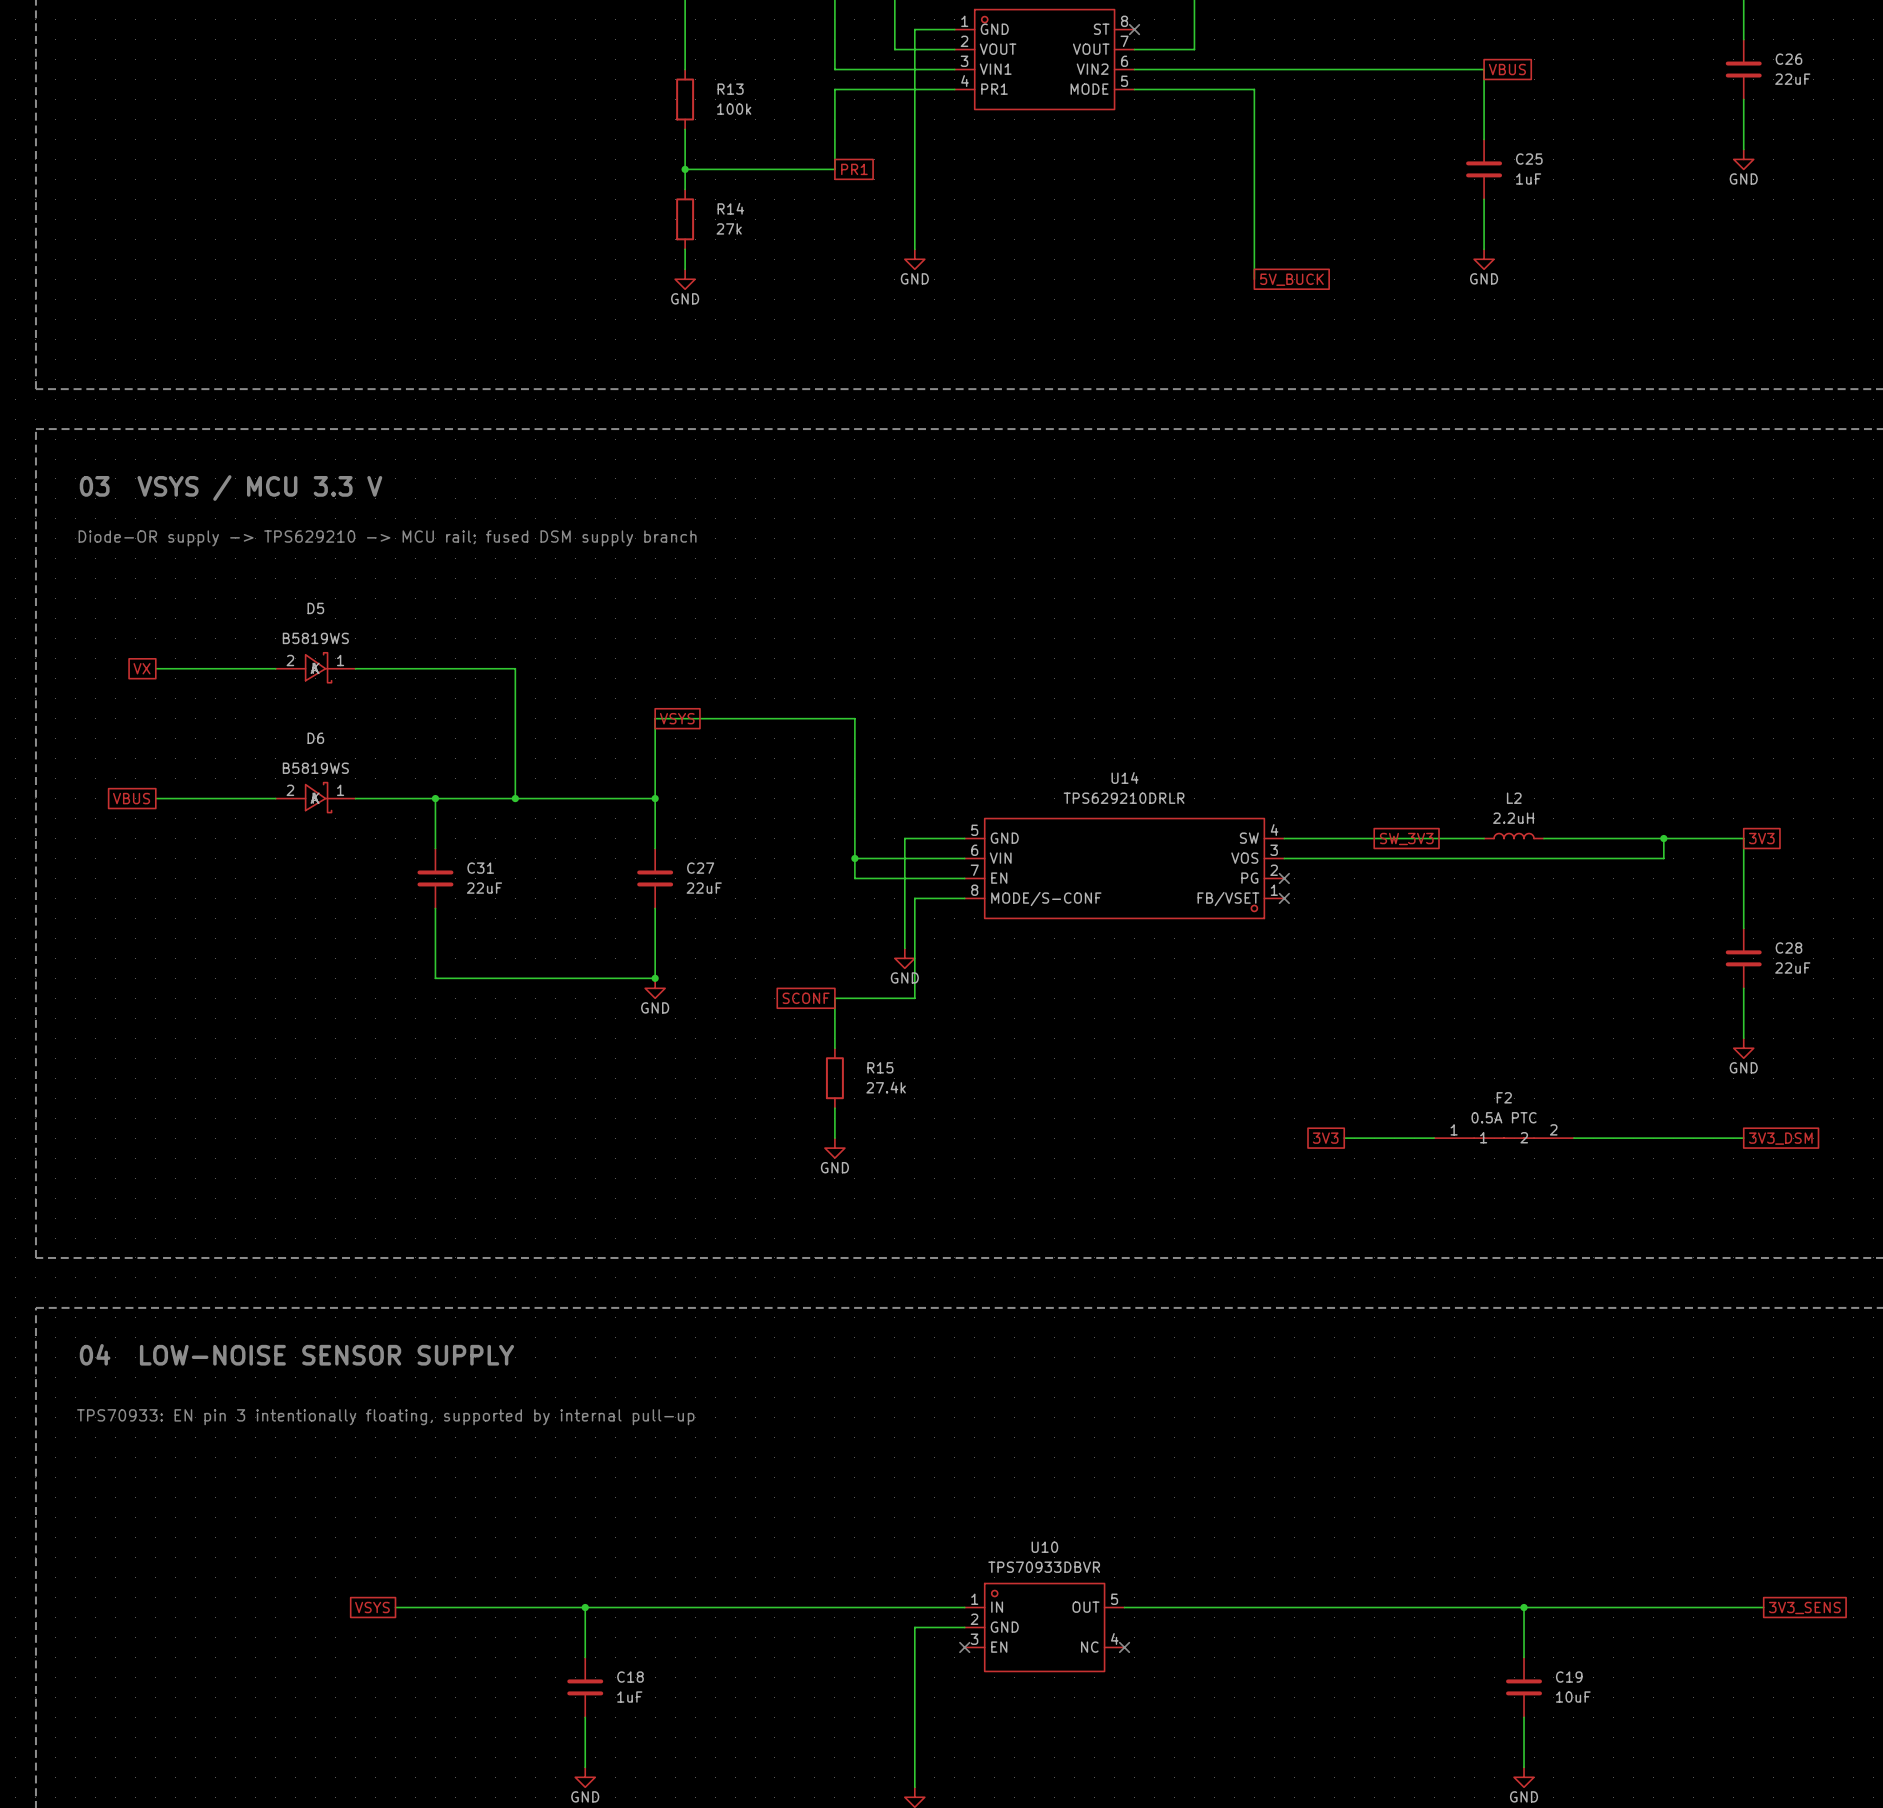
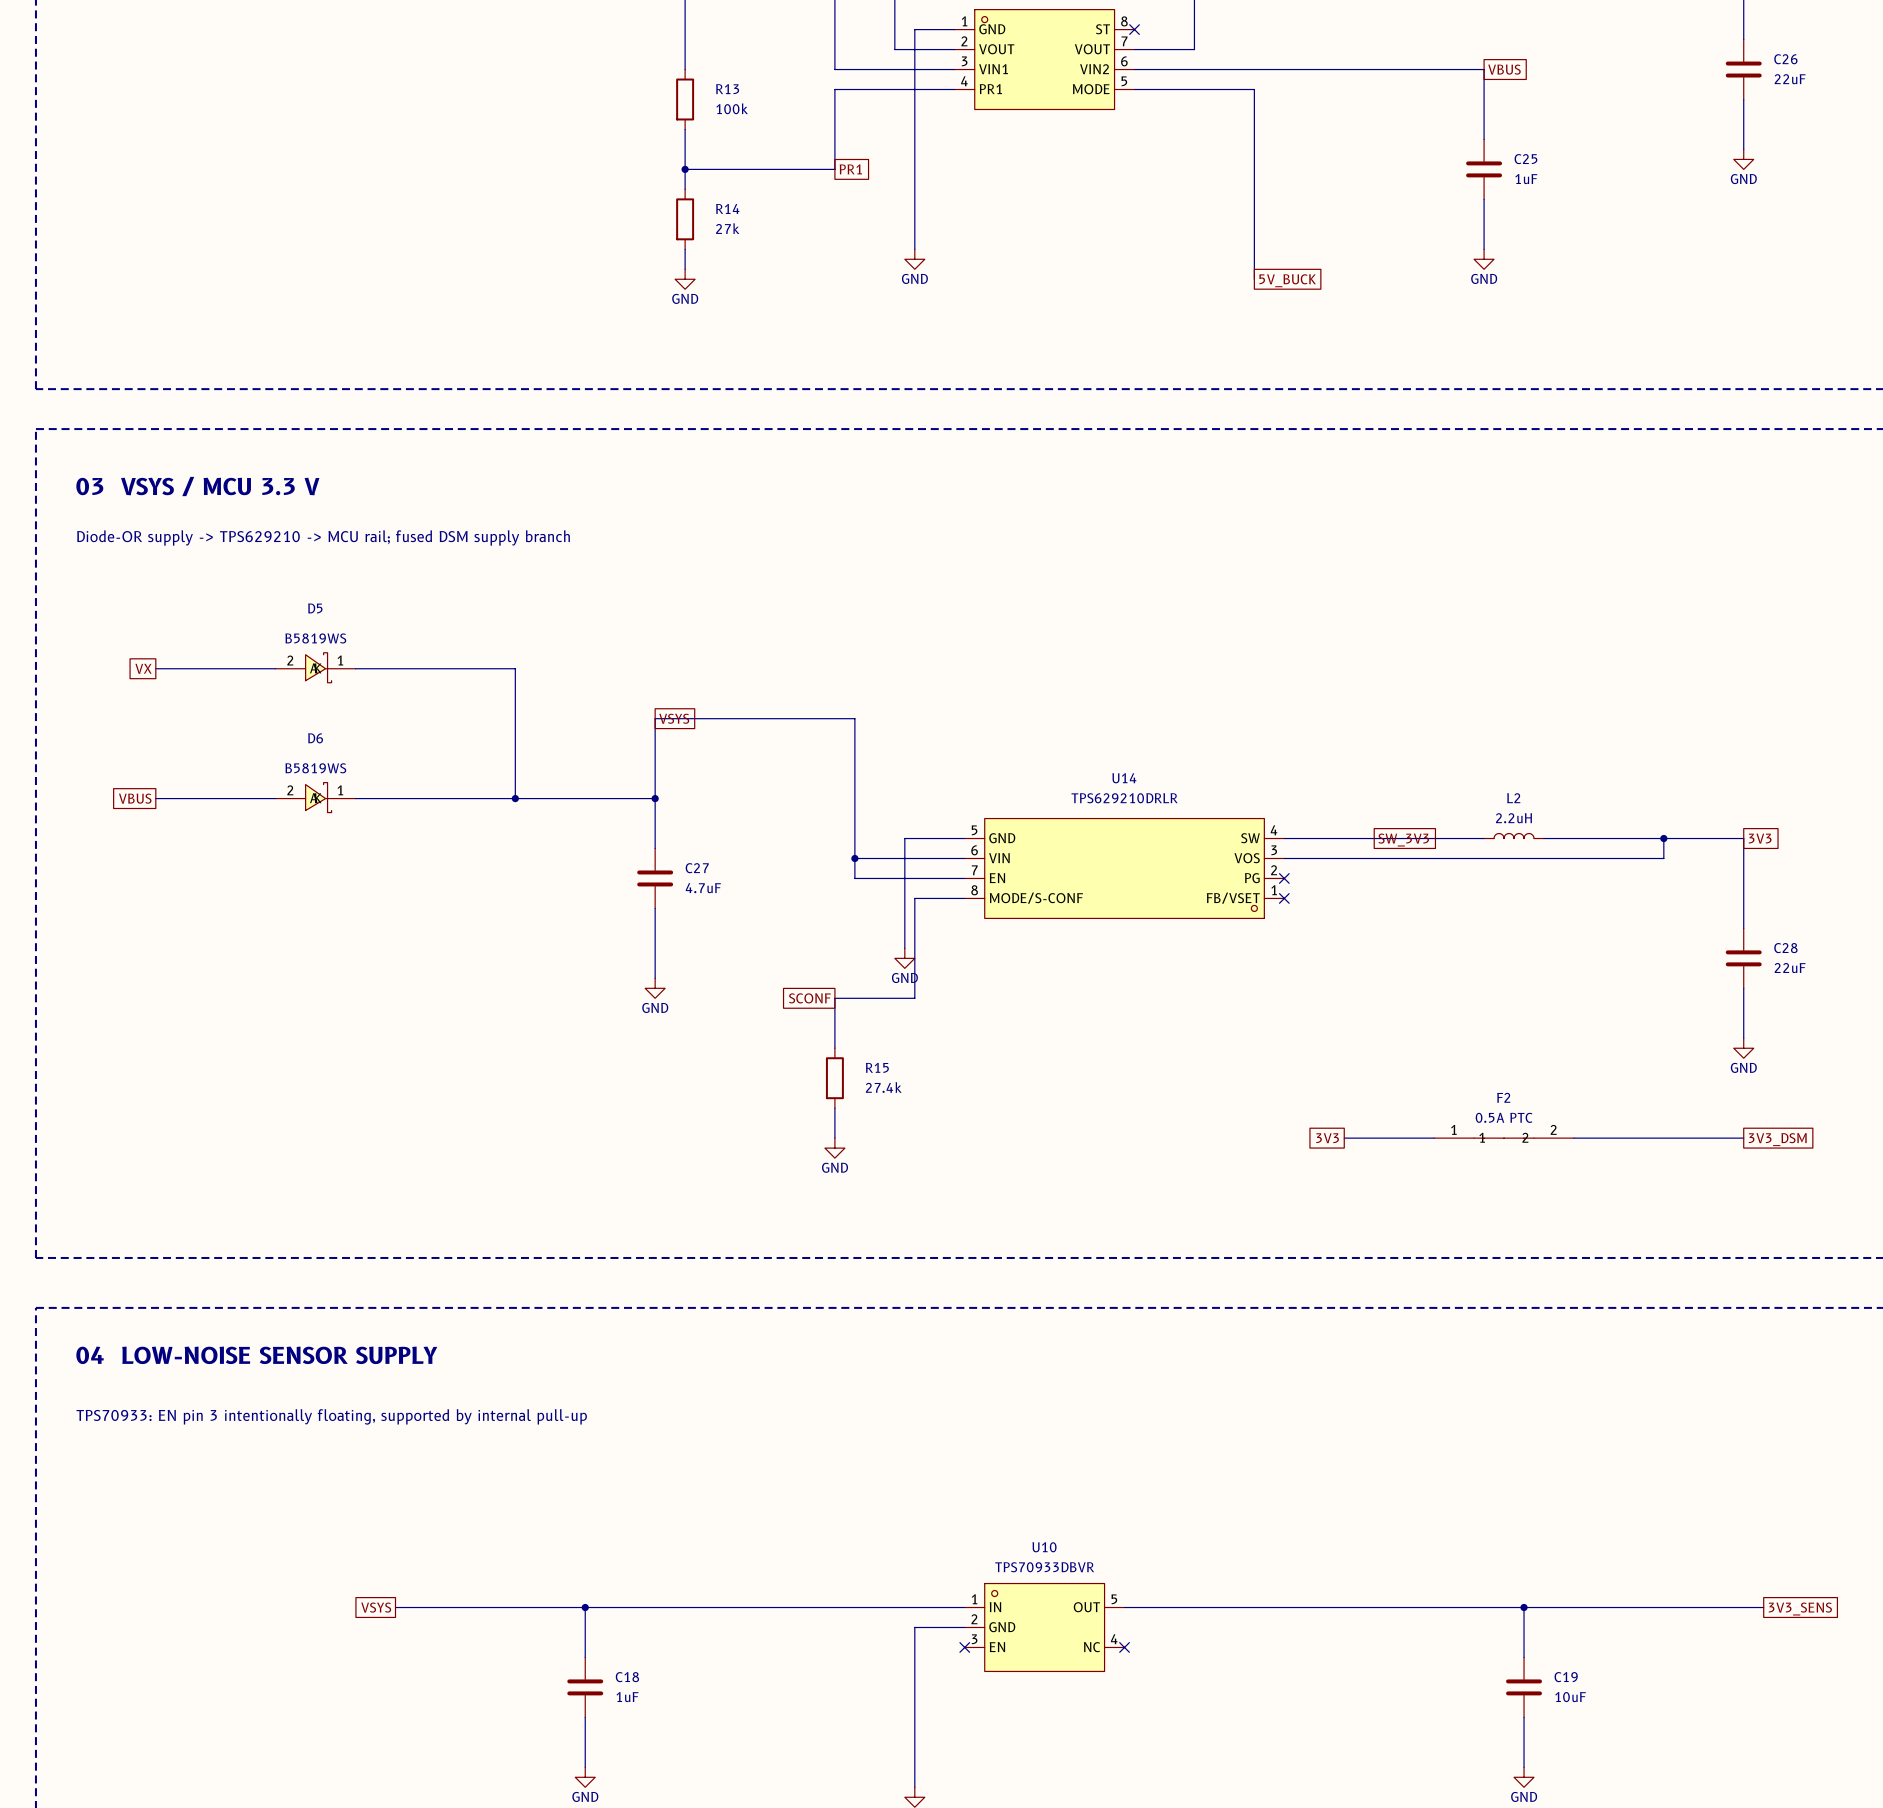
wire: (435, 798) (435, 848) -> none
junction: (435, 798) -> none
C31: 22uF (435, 878) -> none
C27 value: 22uF (704, 888) -> 4.7uF (703, 888)
wire: (435, 908) (435, 978) (655, 978) -> none
junction: (655, 978) -> none

